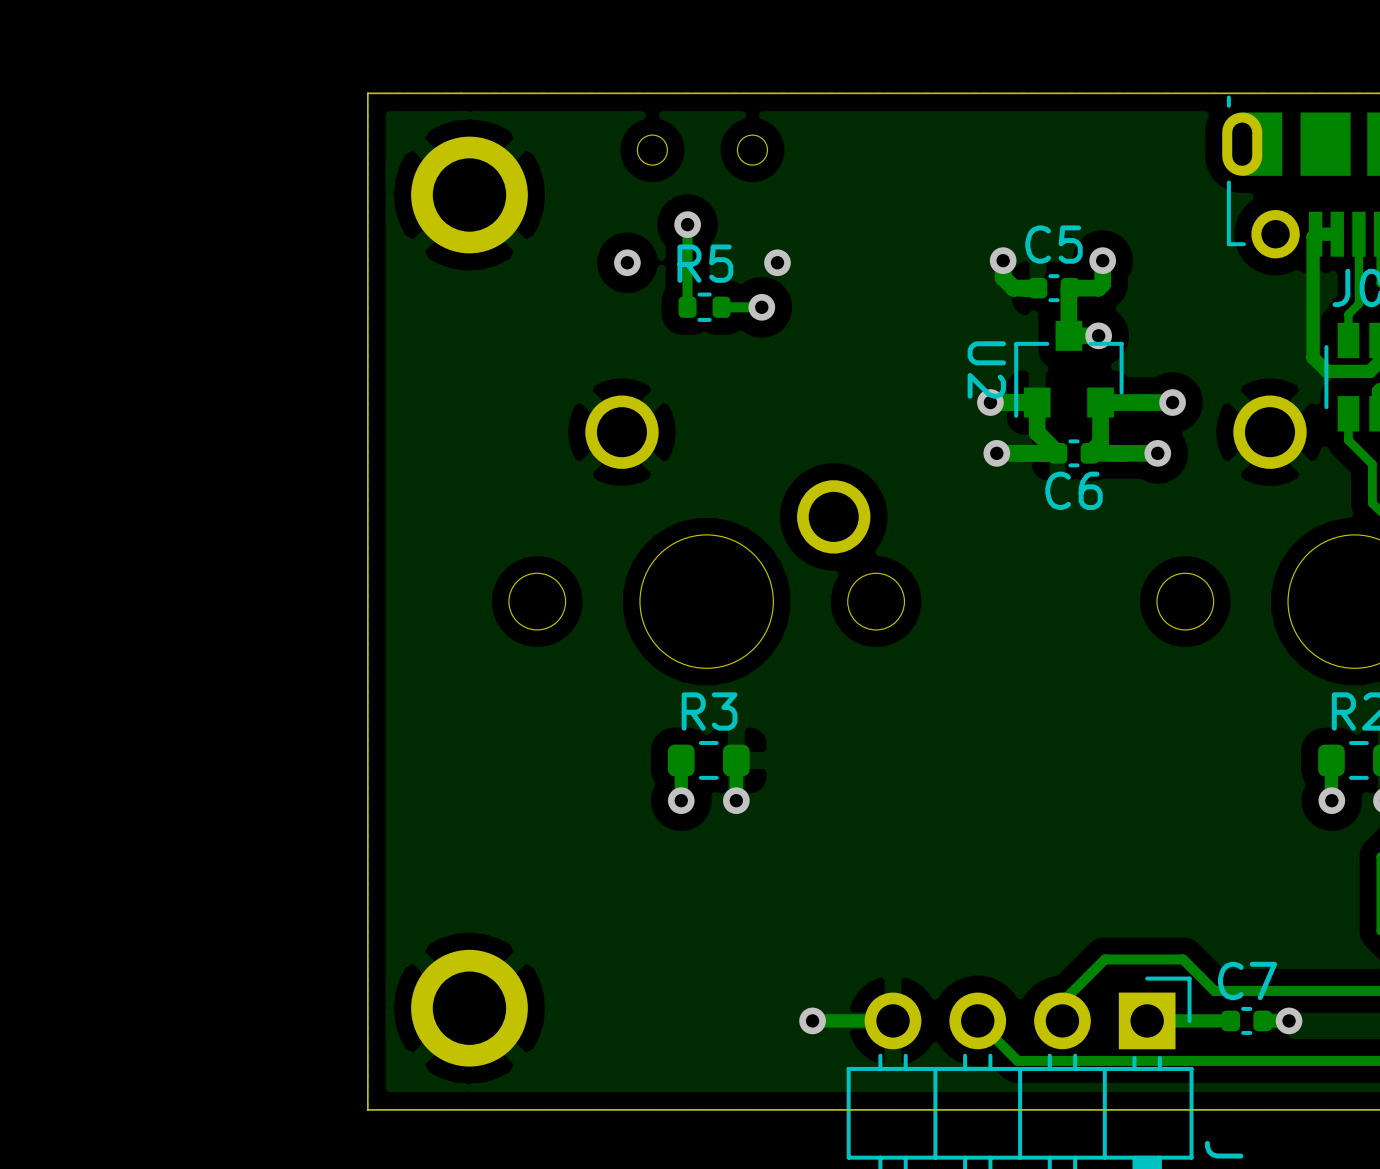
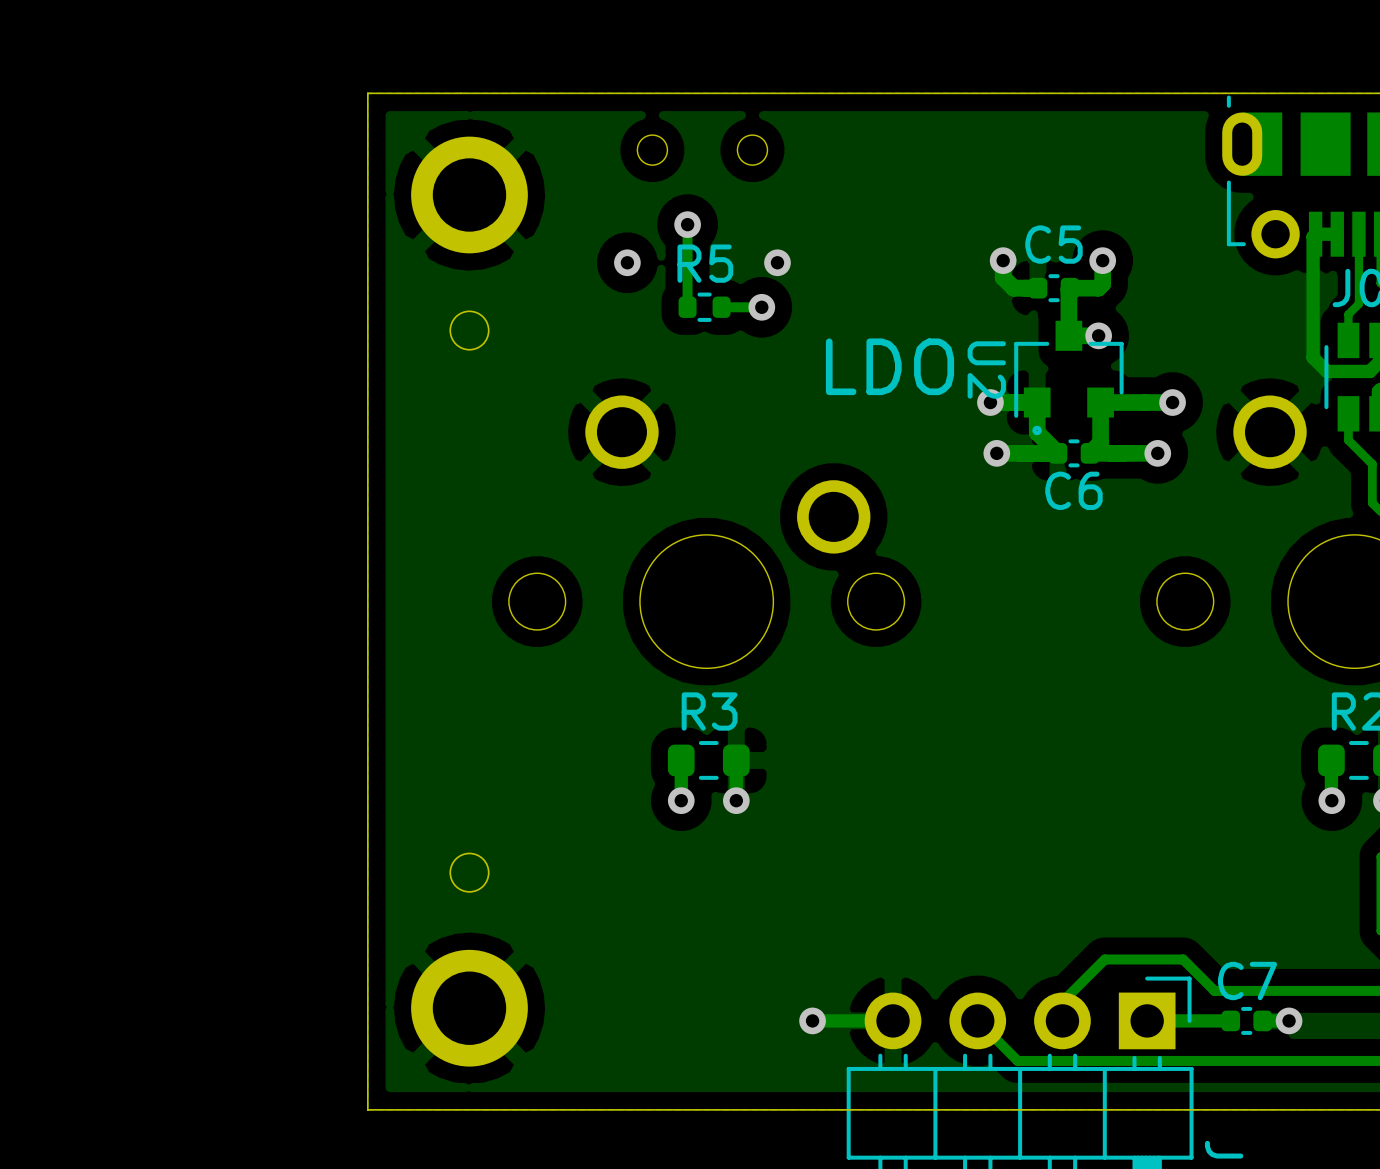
round board edge: none -> [449, 310, 490, 351]
text: none -> LDO (889, 366)
drawing: none -> [1032, 425, 1042, 436]
round board edge: none -> [449, 852, 490, 893]

